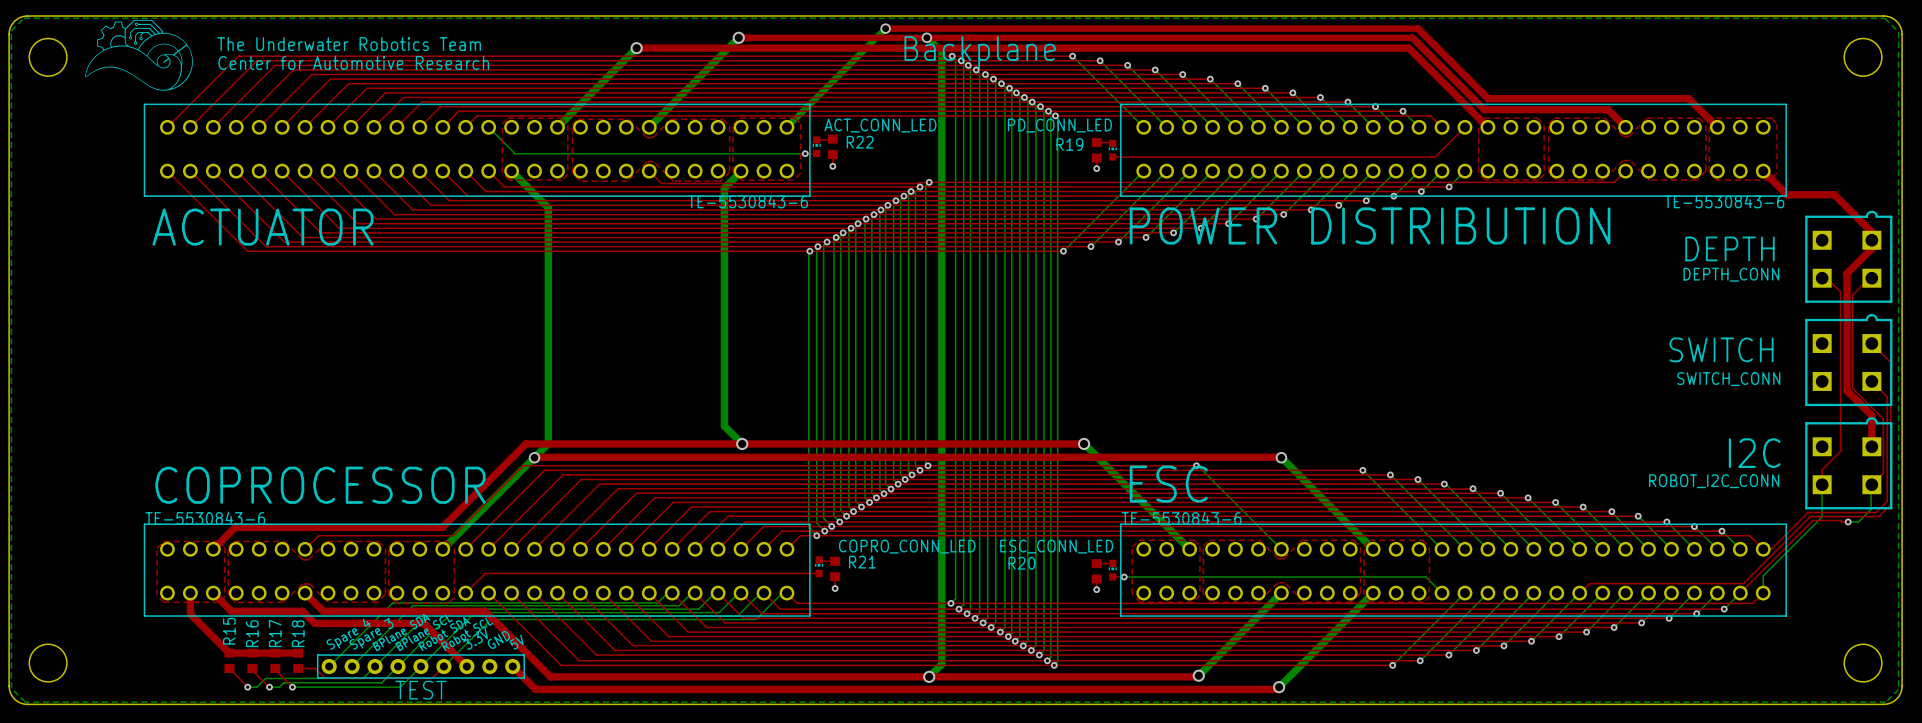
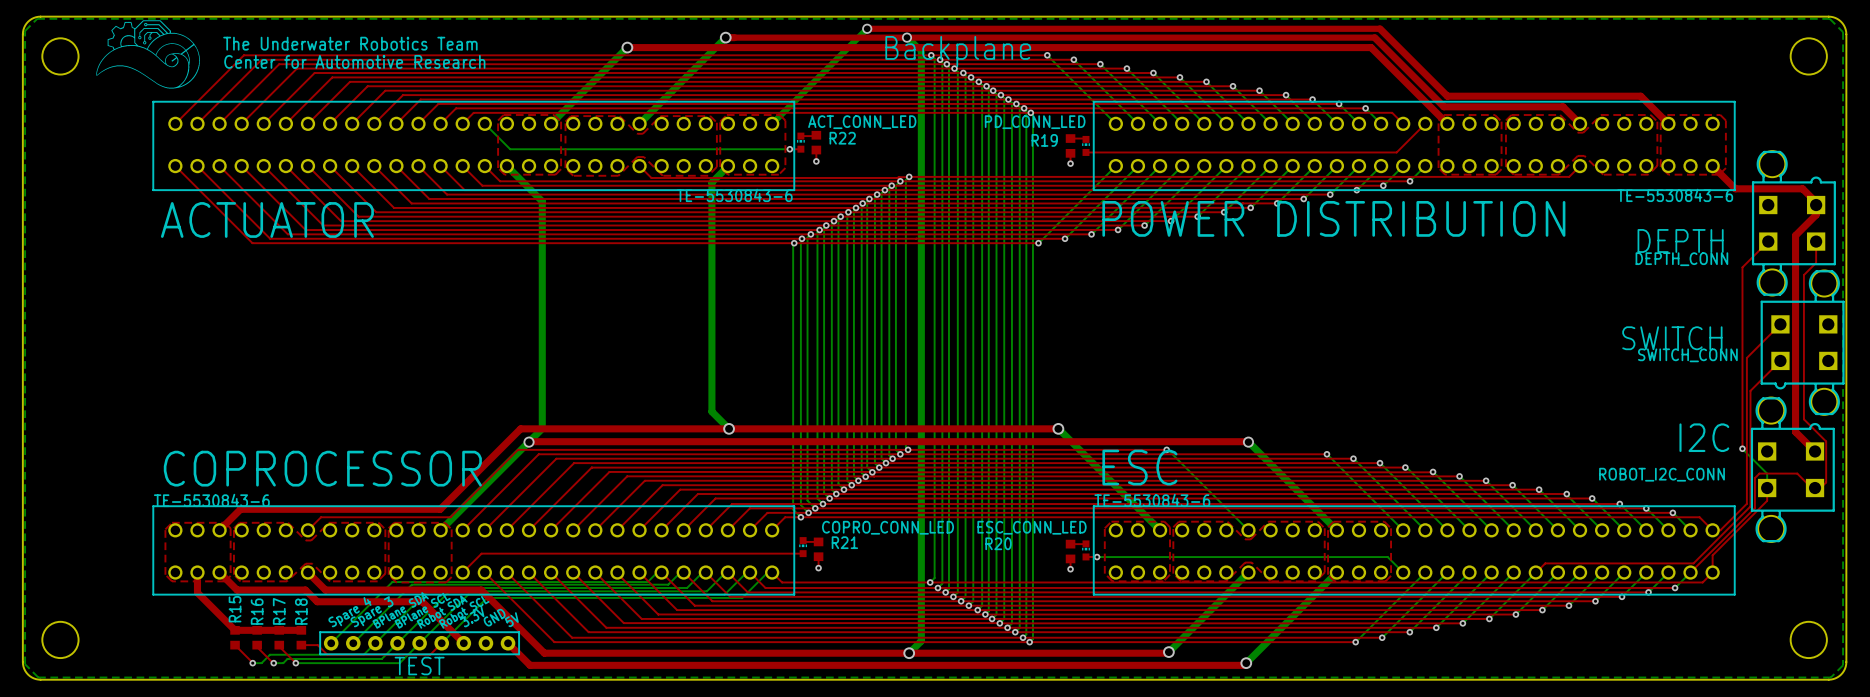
top track: (1834, 194) (1871, 232) (1871, 248) (1846, 273) (1846, 390) (1871, 415) (1871, 446) -> (1781, 188) (1802, 188) (1816, 202) (1816, 214) (1795, 235) (1795, 431) (1815, 451)
DEPTH_CONN: none -> (1793, 223)
top track: none -> (1768, 241) (1742, 267) (1742, 448)
DEPTH_CONN: (1848, 256) -> none
top track: (1822, 278) (1826, 278) (1840, 292) (1840, 451) (1822, 469) (1822, 484) -> none
top track: (1871, 278) (1869, 278) (1852, 295) (1852, 388) (1883, 419) (1883, 473) (1871, 484) -> none
top track: (1871, 343) (1890, 362) (1890, 504) (1878, 516) (1810, 516) (1802, 524) -> (1780, 360) (1750, 390) (1750, 506)
SWITCH_CONN: none -> (1802, 342)
SWITCH_CONN: (1848, 360) -> none
top track: (1871, 381) (1887, 396) (1887, 501) (1875, 512) (1808, 512) (1798, 521) -> (1780, 324) (1746, 357) (1746, 503)
ROBOT_I2C_CONN footprint: [1805, 417, 1893, 510] -> [1750, 397, 1835, 543]
bottom track: none -> (1742, 448) (1767, 473) (1767, 488)
via: none -> (1742, 448)
bottom track: (1822, 484) (1822, 517) (1763, 575) (1763, 593) -> none
bottom track: (1871, 484) (1871, 509) (1858, 521) (1848, 521) -> none
top track: none -> (1767, 488) (1767, 500) (1712, 555) (1712, 572)
top track: (1848, 521) (1812, 520) (1807, 526) -> (1816, 241) (1816, 262) (1803, 275) (1803, 419) (1826, 441) (1826, 482) (1820, 488) (1811, 488) (1797, 473) (1759, 473) (1754, 478) (1754, 508)
via: (1848, 521) -> none

